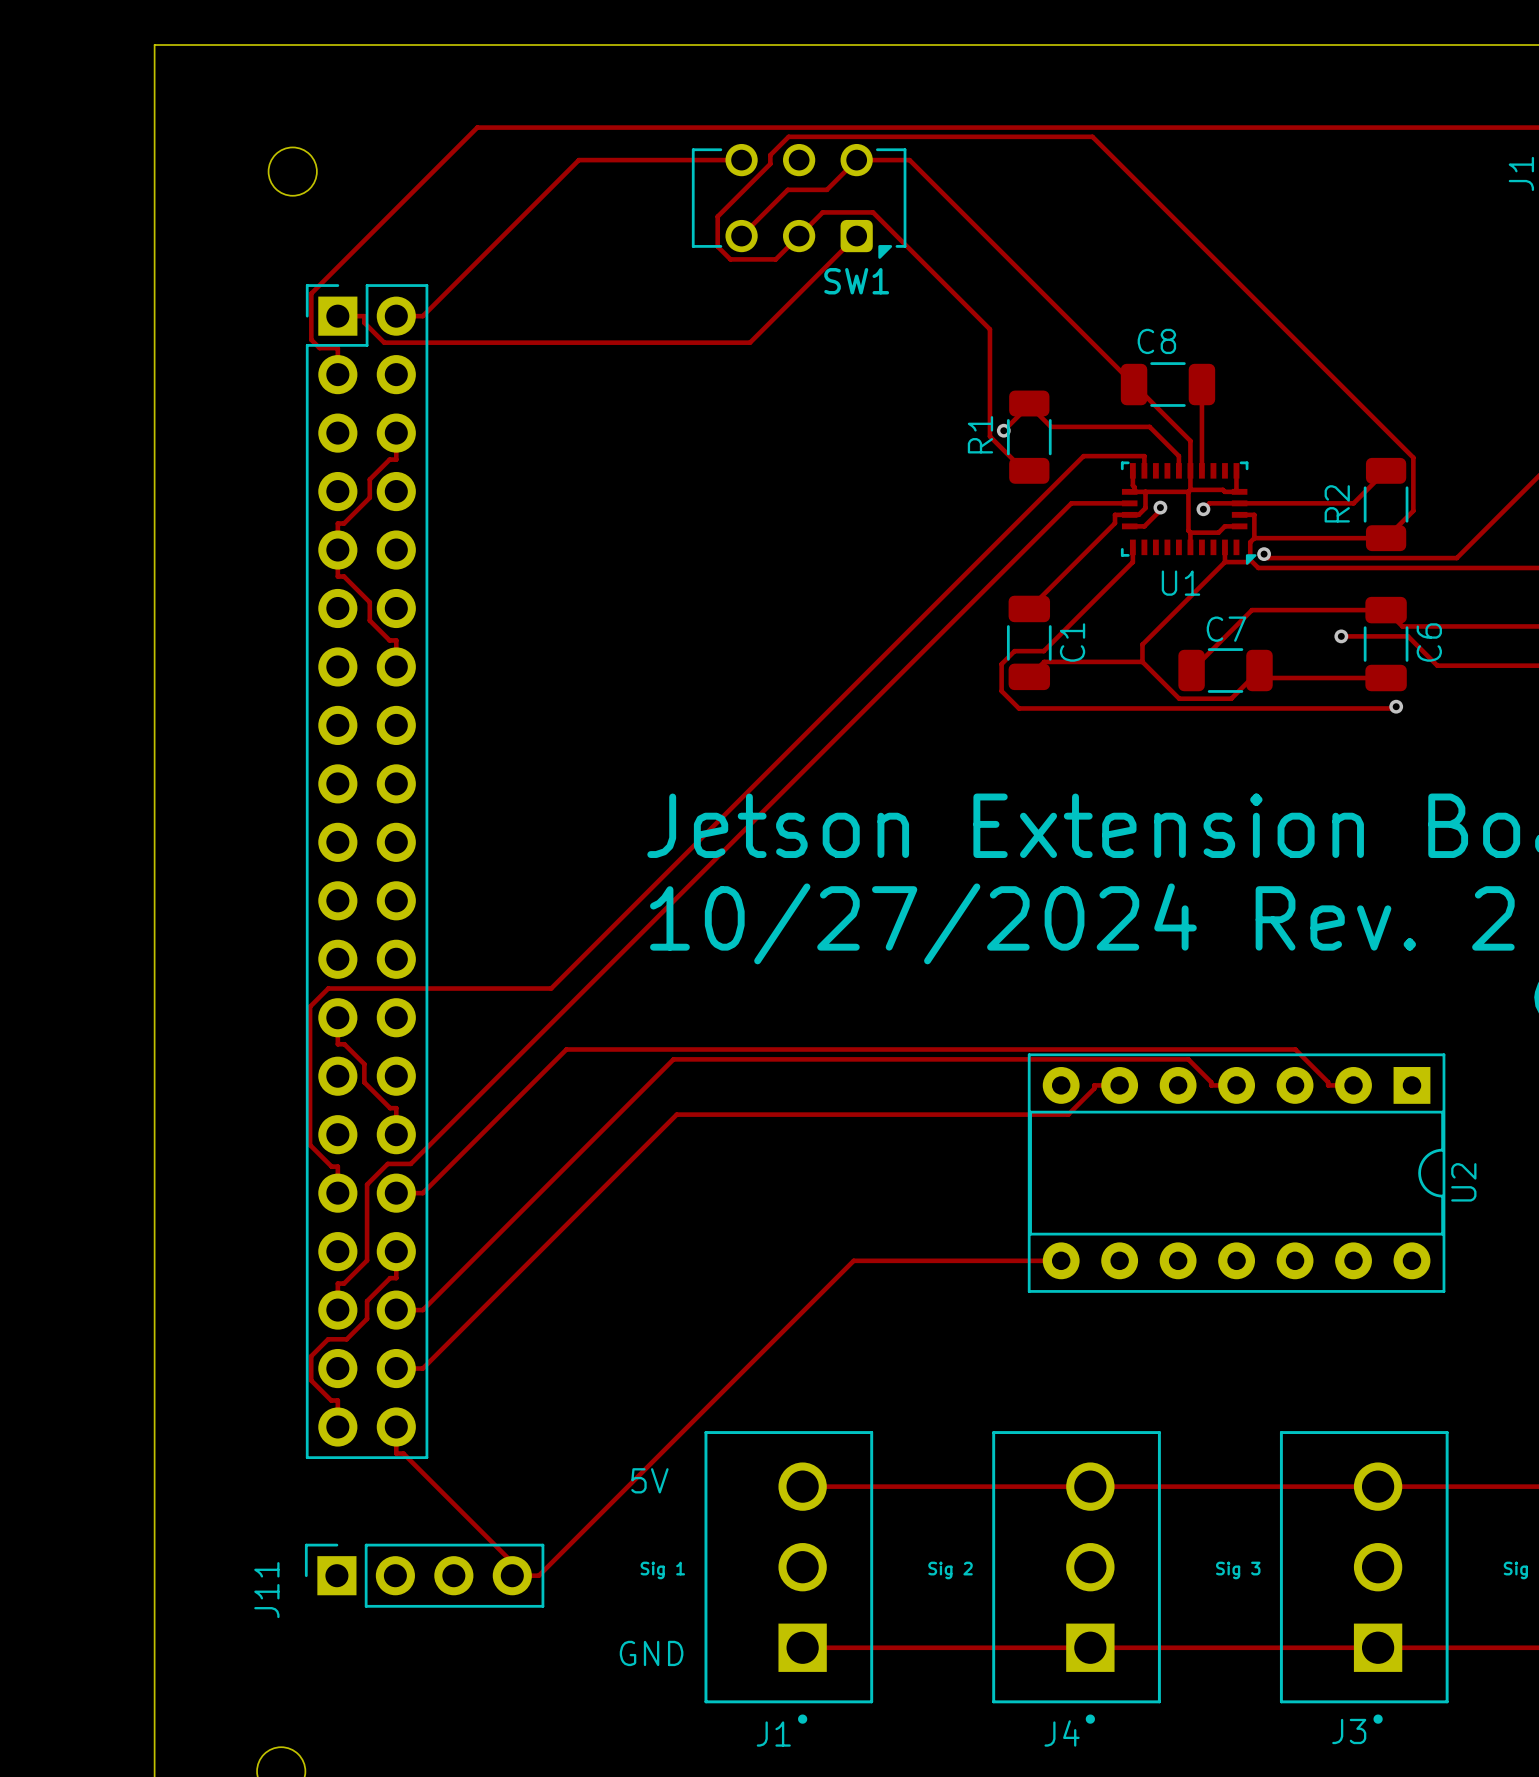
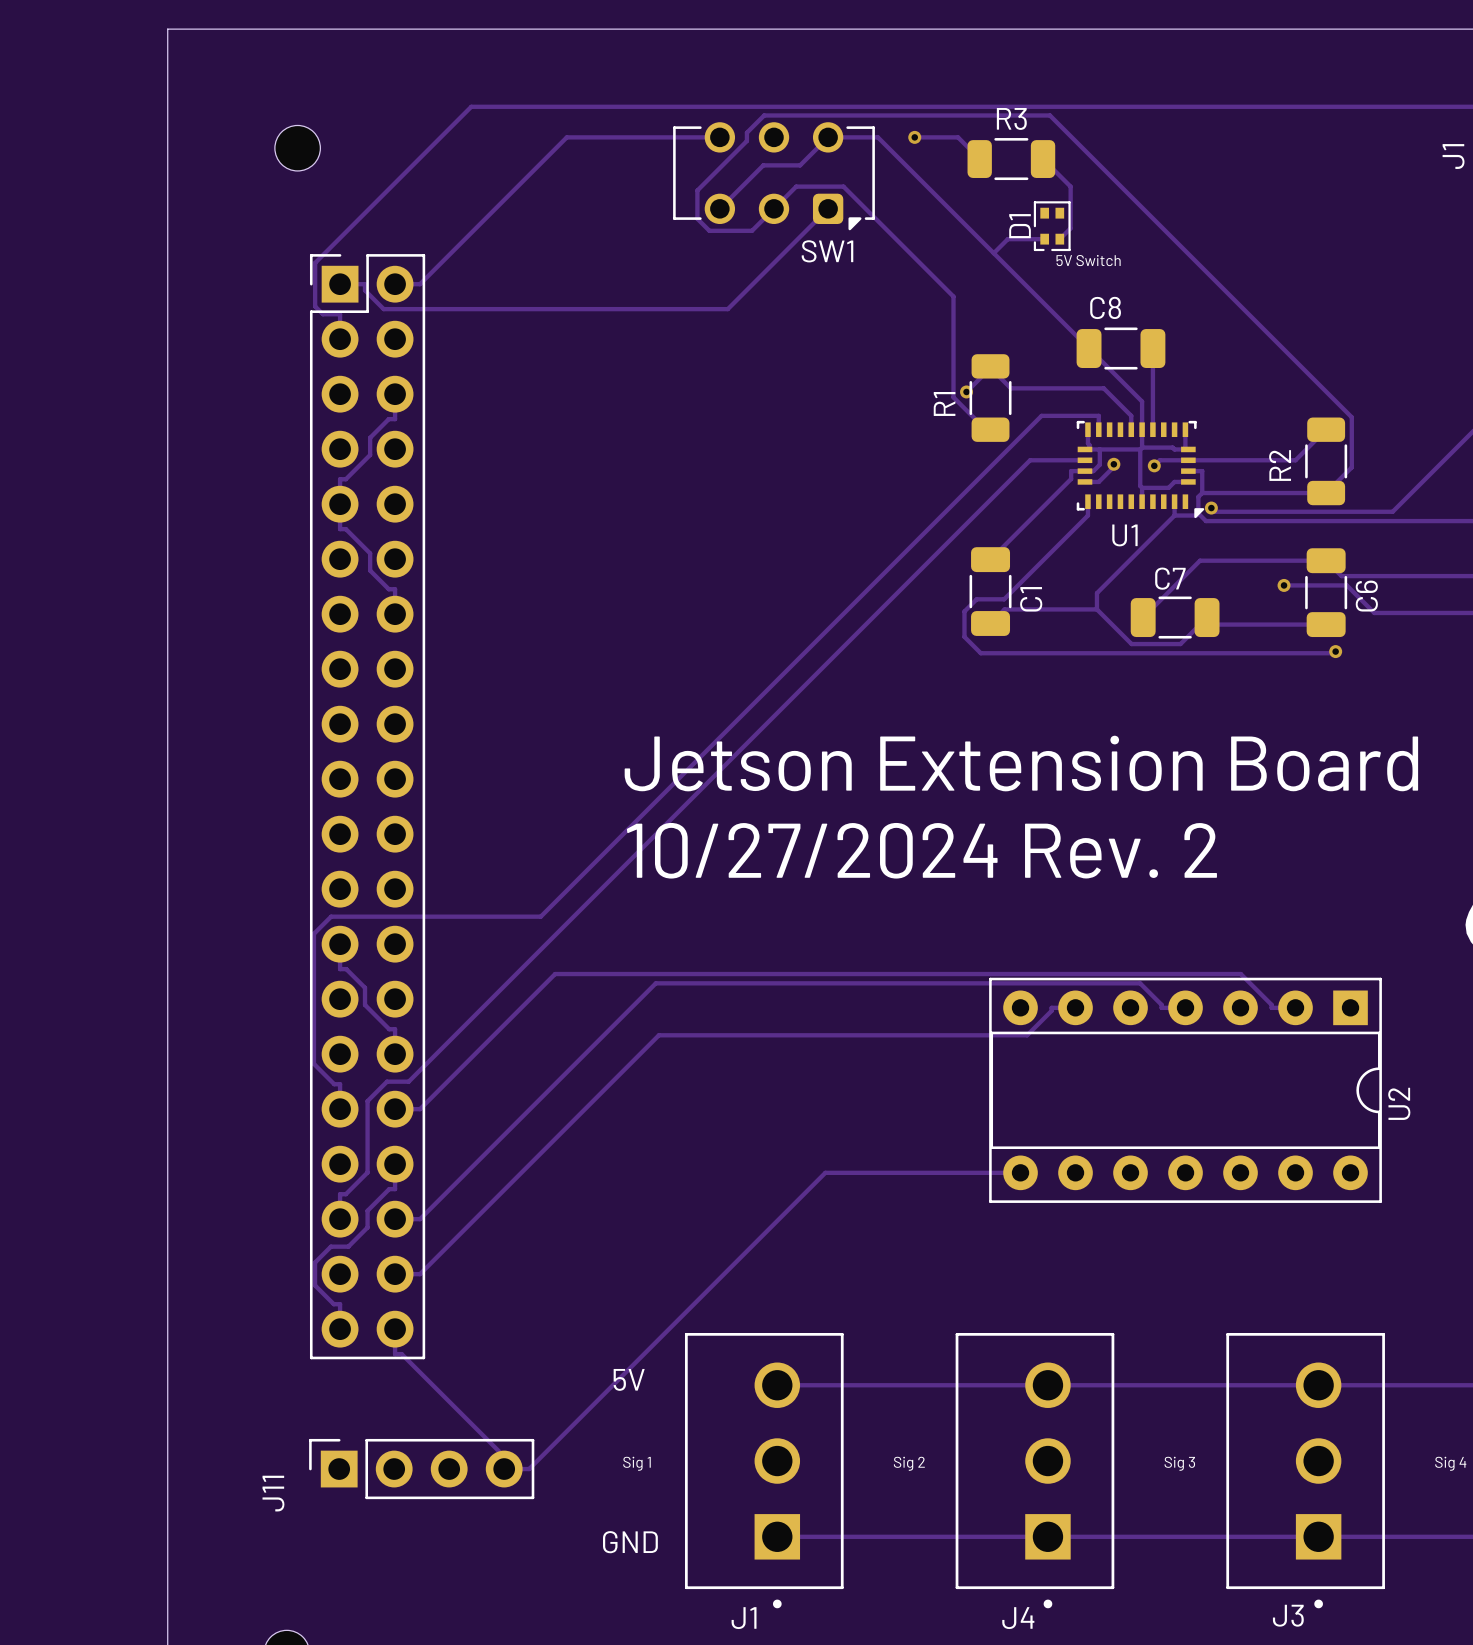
track: none -> (914, 137) (958, 137) (979, 159)
via: none -> (914, 137)
R3: none -> (1011, 159)
track: none -> (1043, 159) (1070, 186) (1070, 228) (1059, 239)
D1: none -> (1052, 226)
track: none -> (1044, 239) (1007, 239) (993, 253)
text: none -> 5V Switch (1088, 260)

